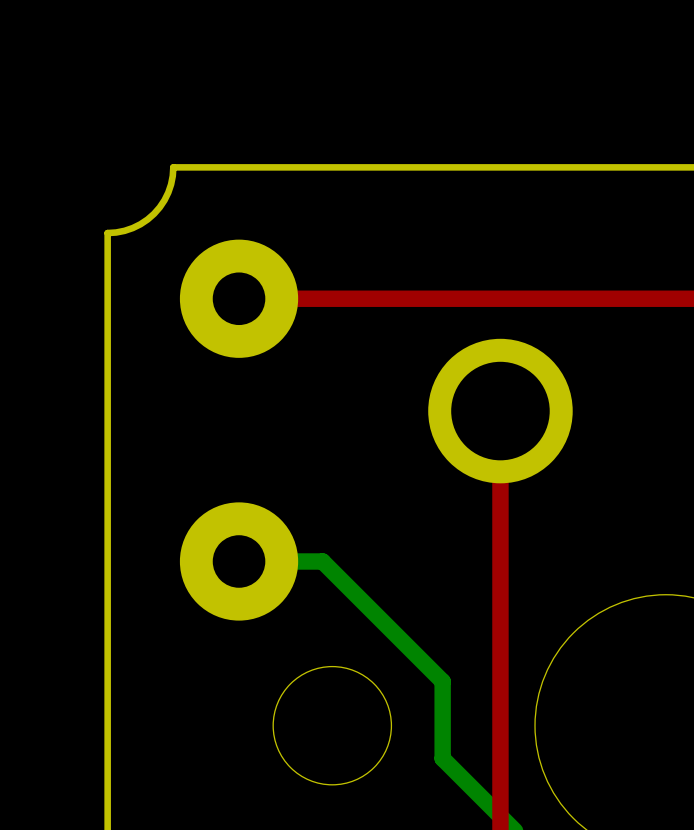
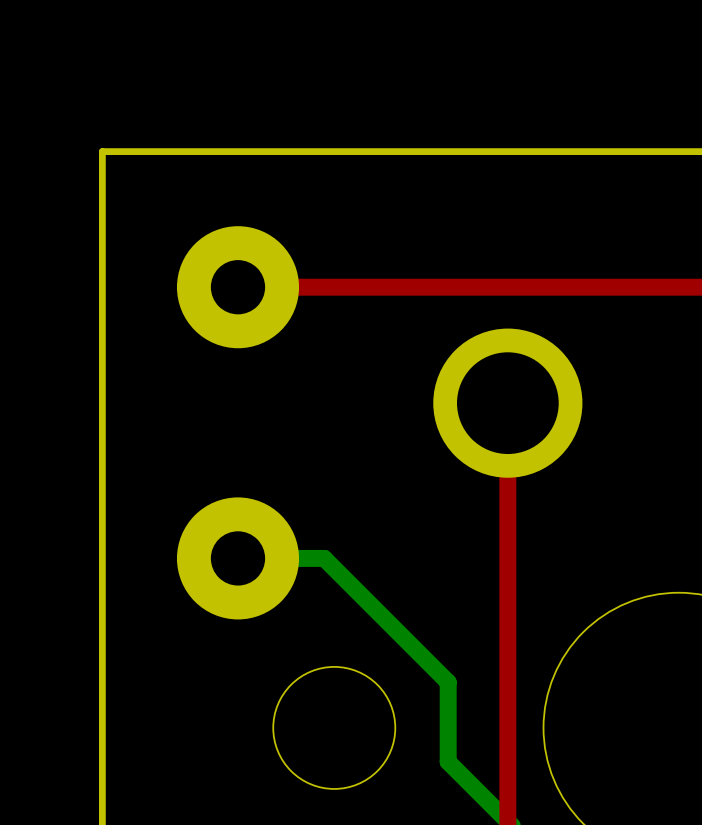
board edge: (173, 167) (168, 192) (154, 213) (132, 228) (107, 233) -> (170, 151) (102, 151) (102, 219)

